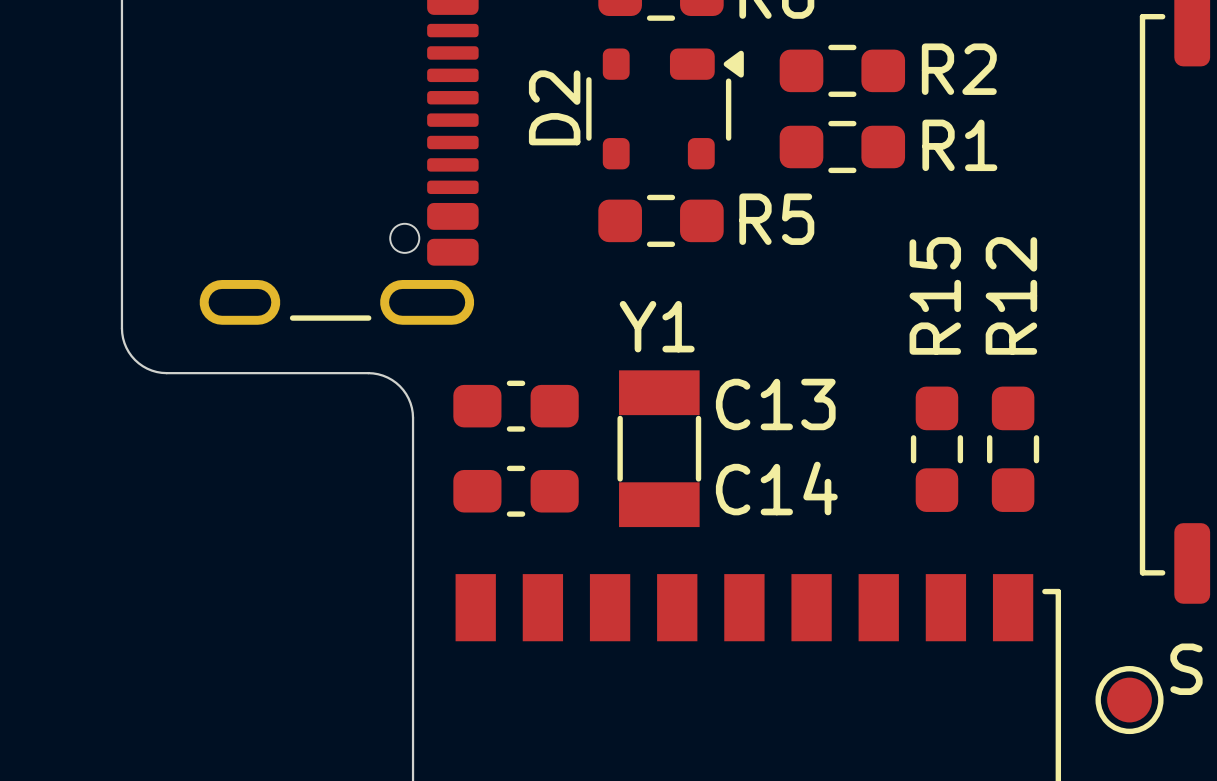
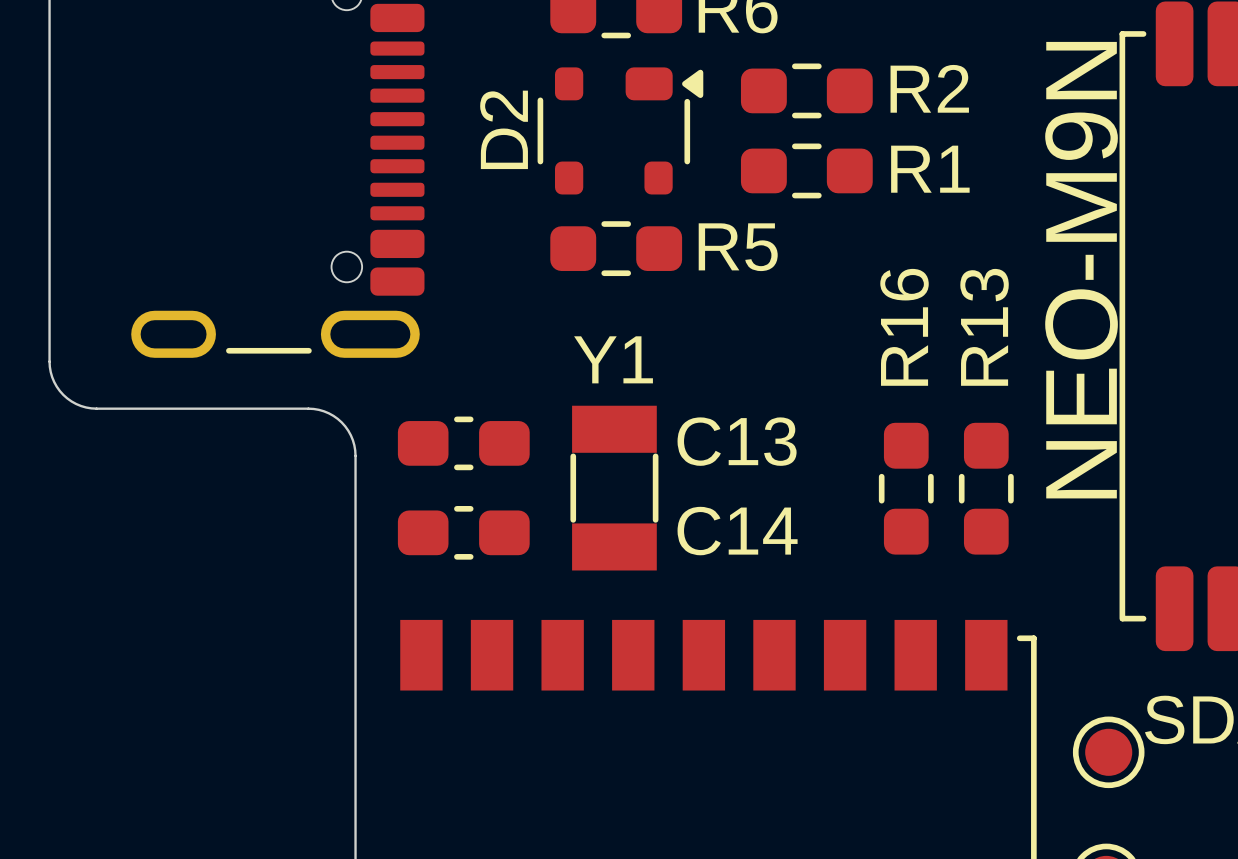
text: none -> NEO-M9N (1081, 270)
R15 name: R15 (935, 295) -> R16 (904, 327)
R12 name: R12 (1011, 295) -> R13 (984, 327)

